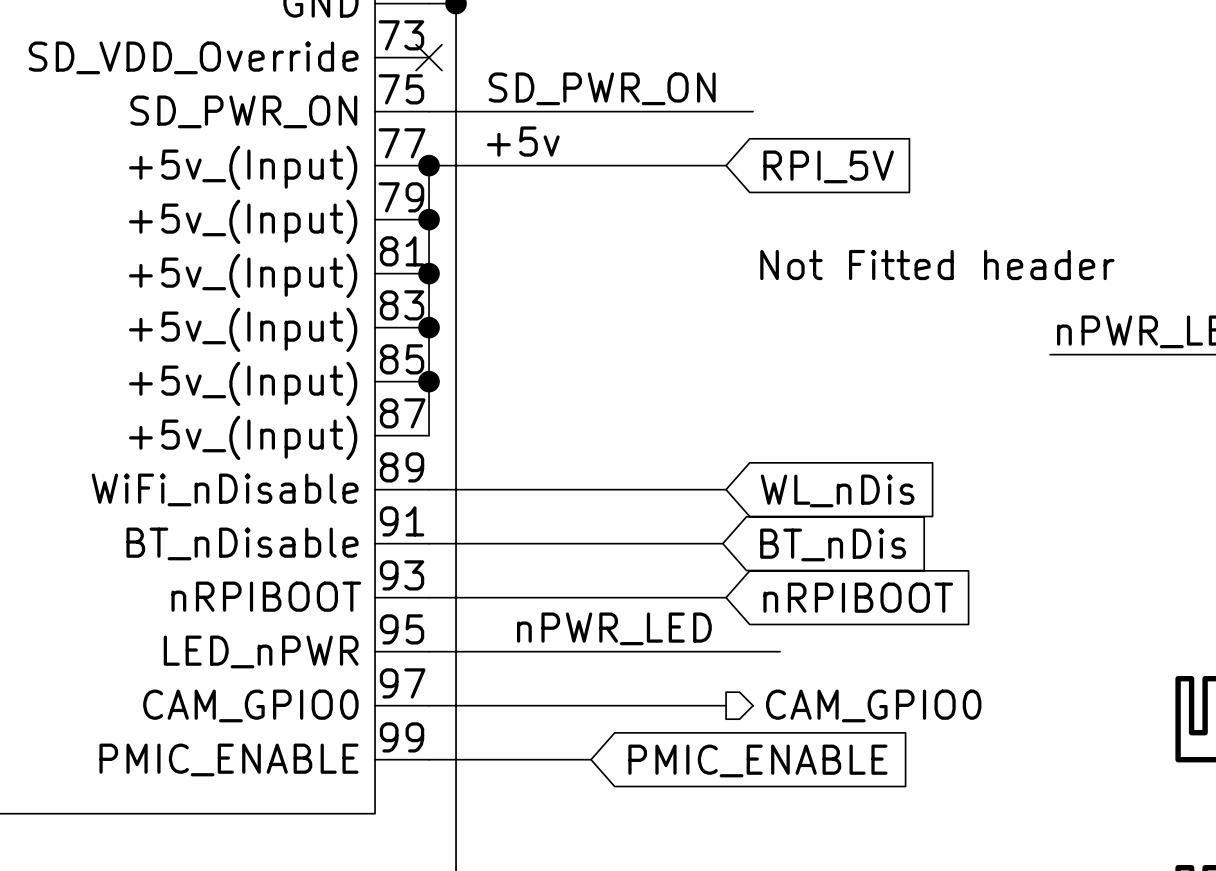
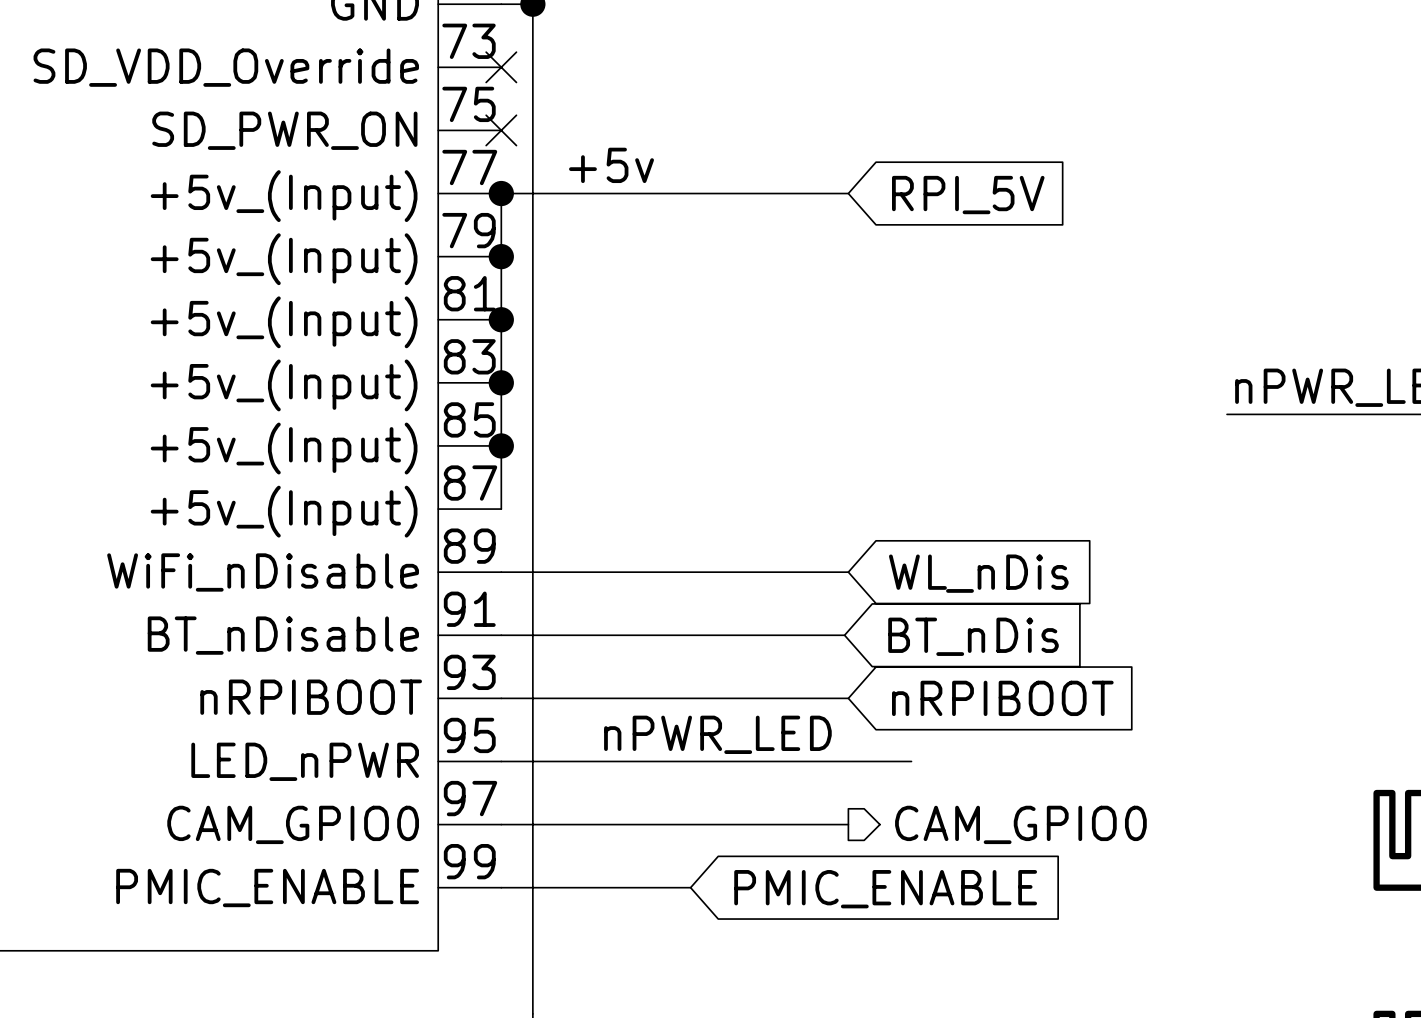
label: SD_PWR_ON (602, 88) -> none
wire: (429, 111) (753, 111) -> none
no-connect mark: none -> (501, 130)
text: Not Fitted header (937, 265) -> none

